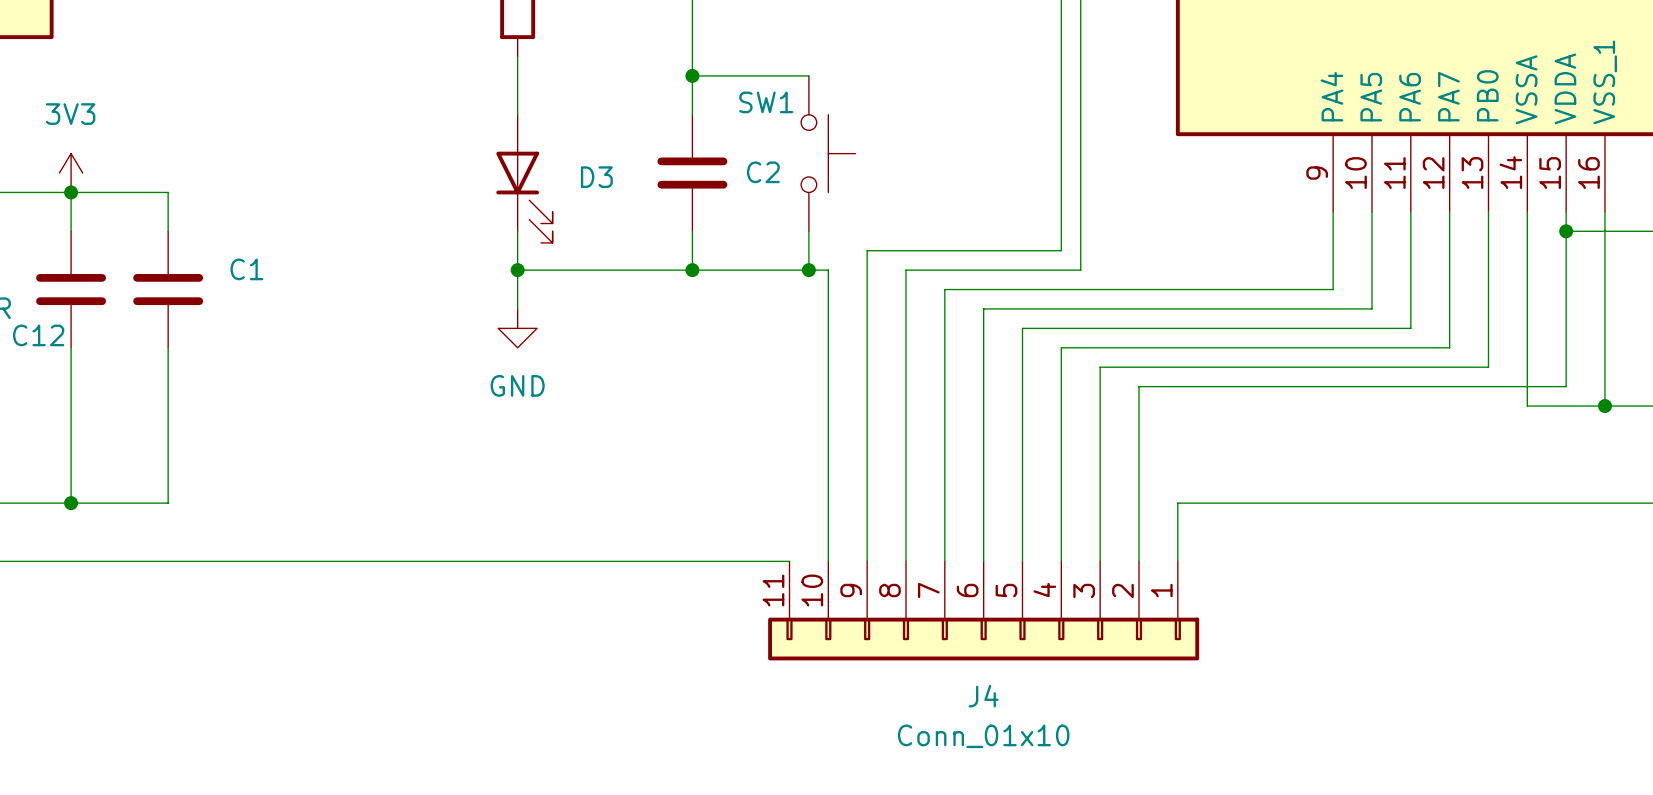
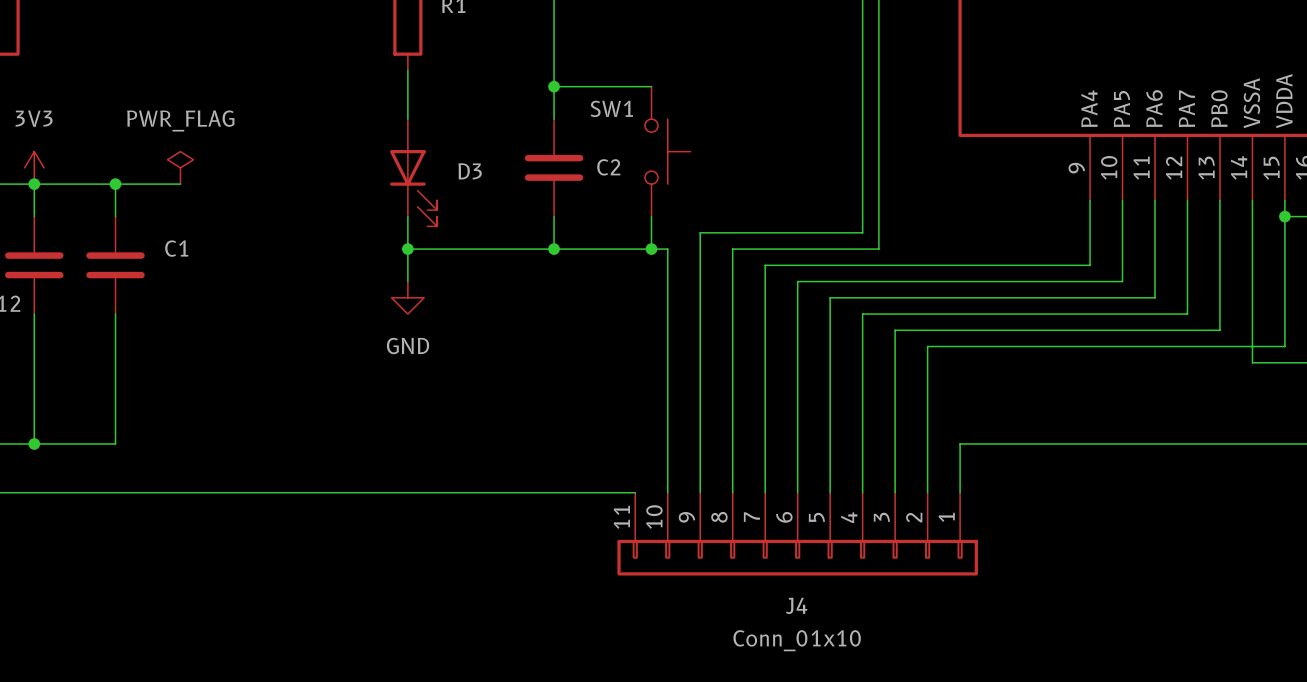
power symbol: none -> PWR_FLAG (180, 167)
wire: none -> (115, 184) (180, 184)
junction: none -> (115, 184)

